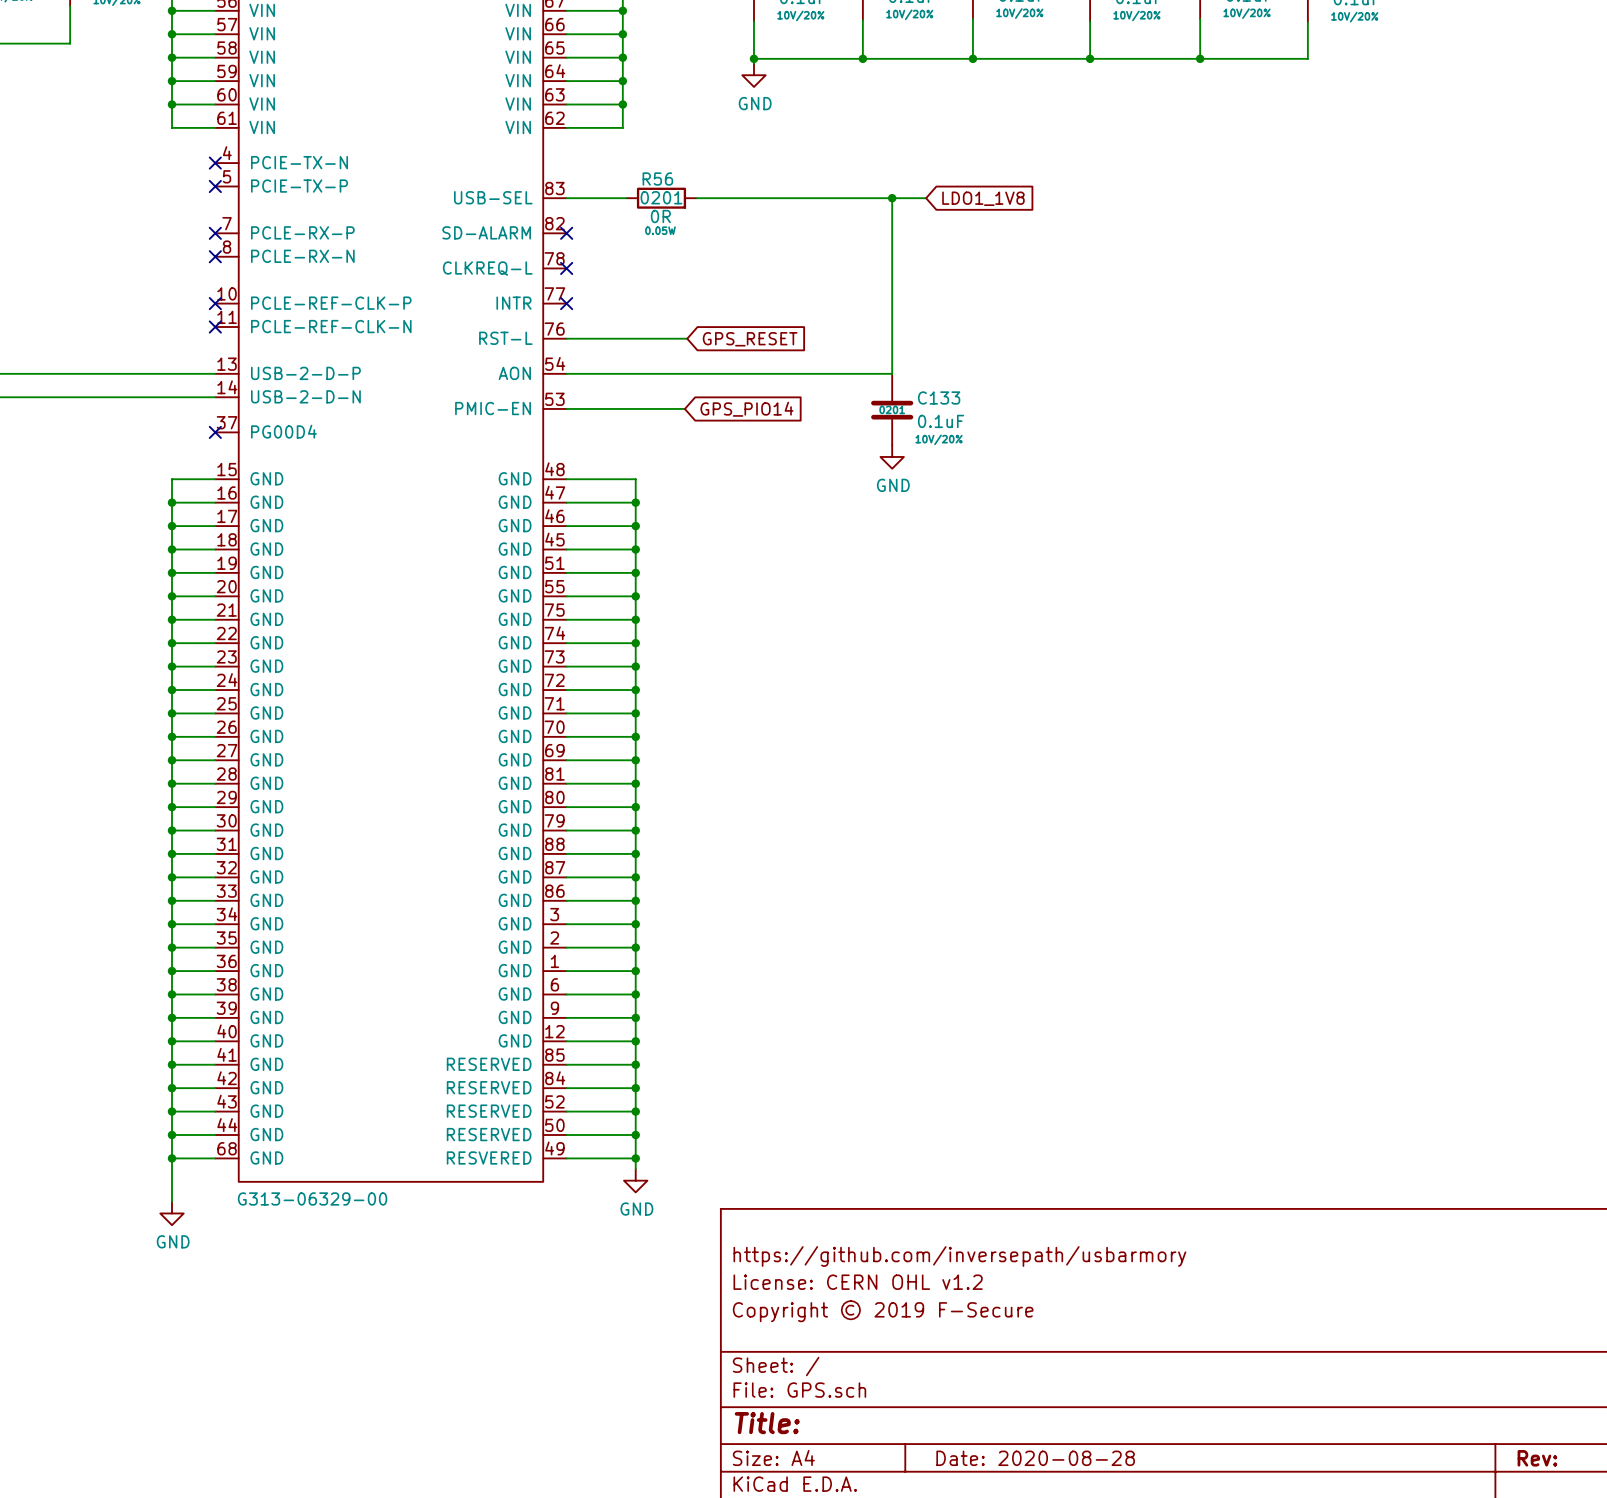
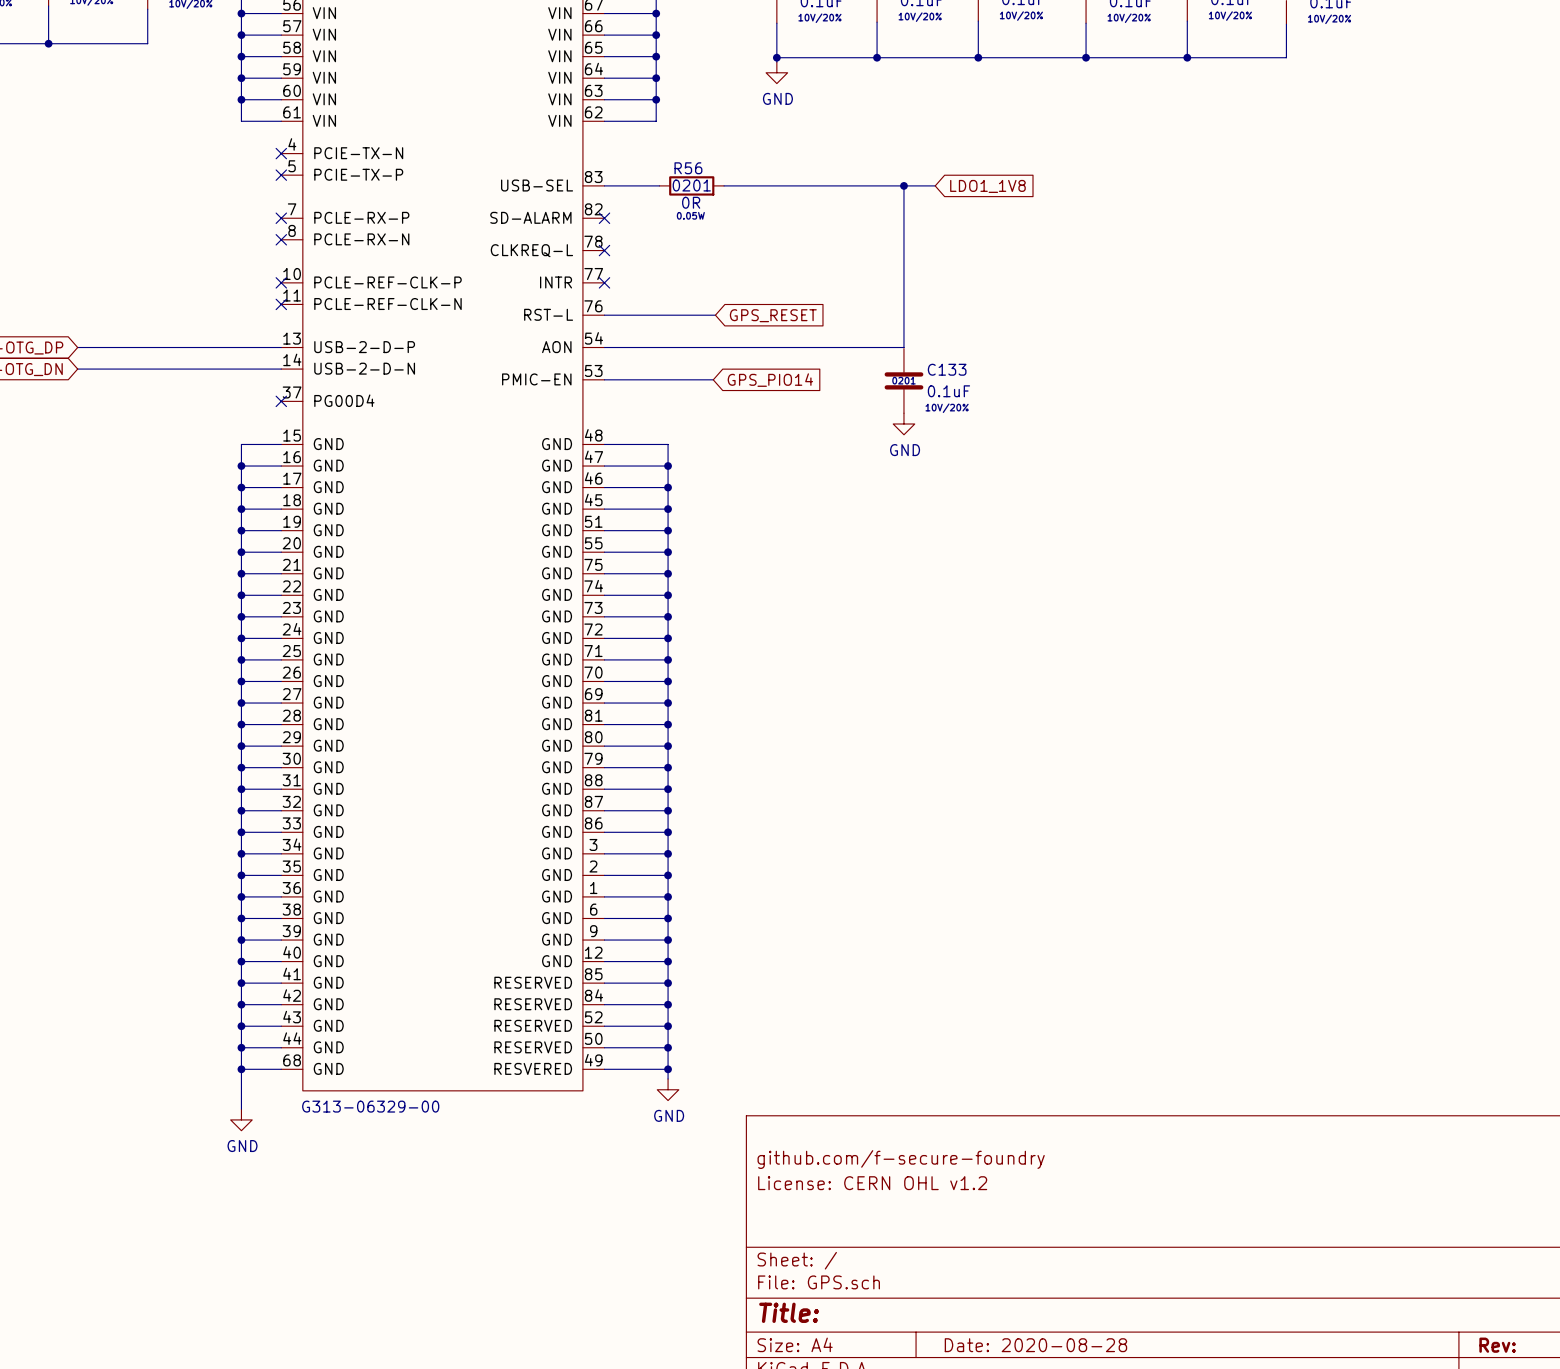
title block: https://github.com/inversepath/usbarmory (959, 1256) -> github.com/f-secure-foundry (901, 1159)
title block: Copyright © 2019 F-Secure (883, 1311) -> none

